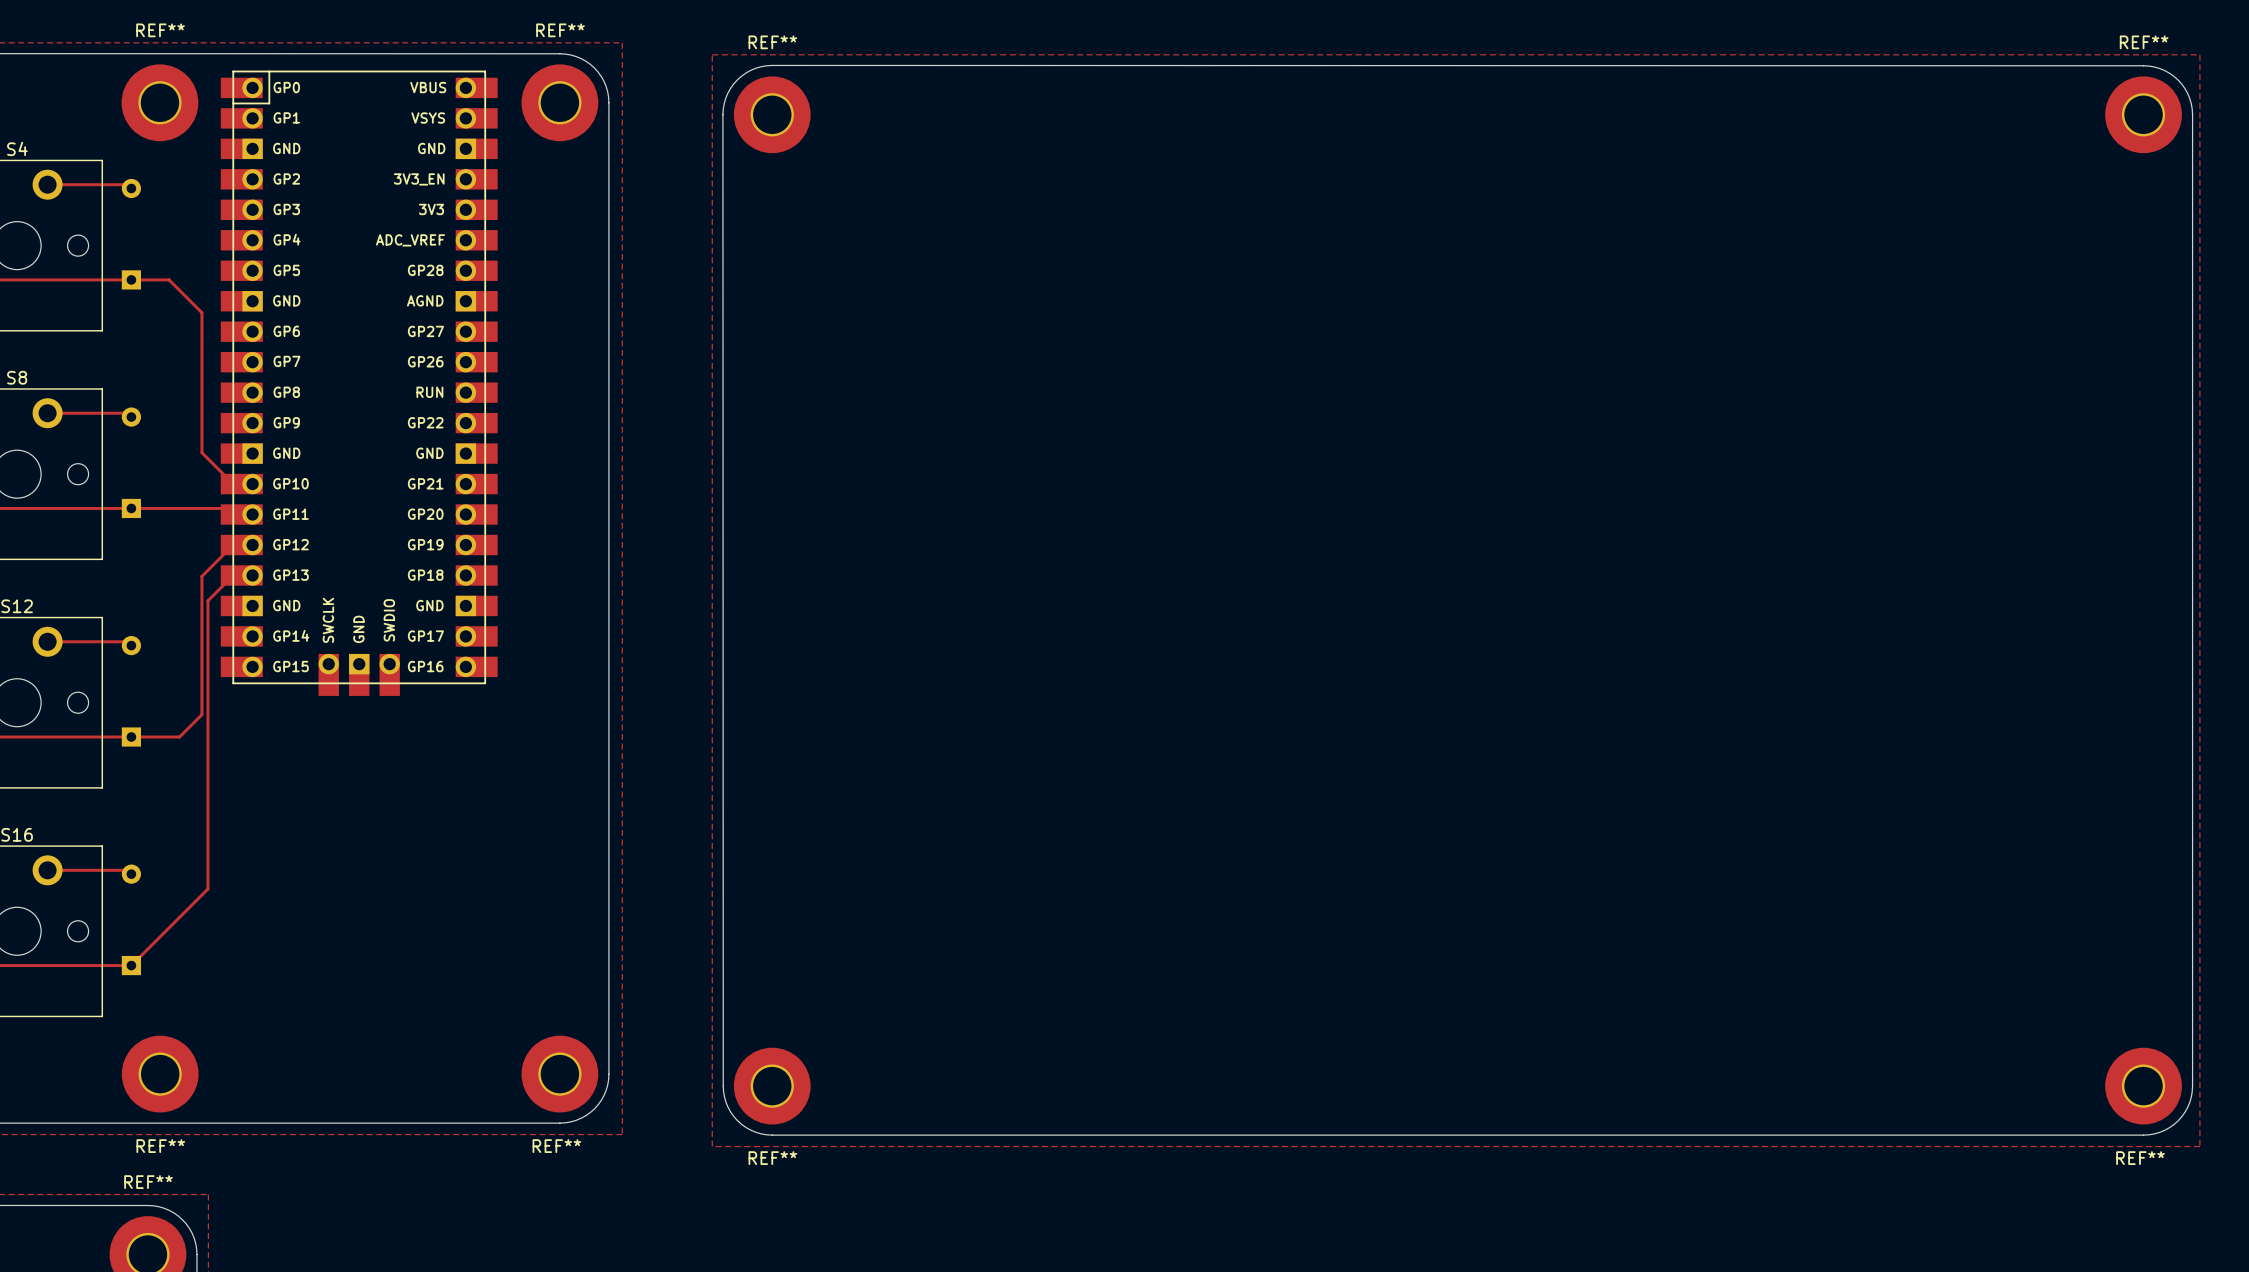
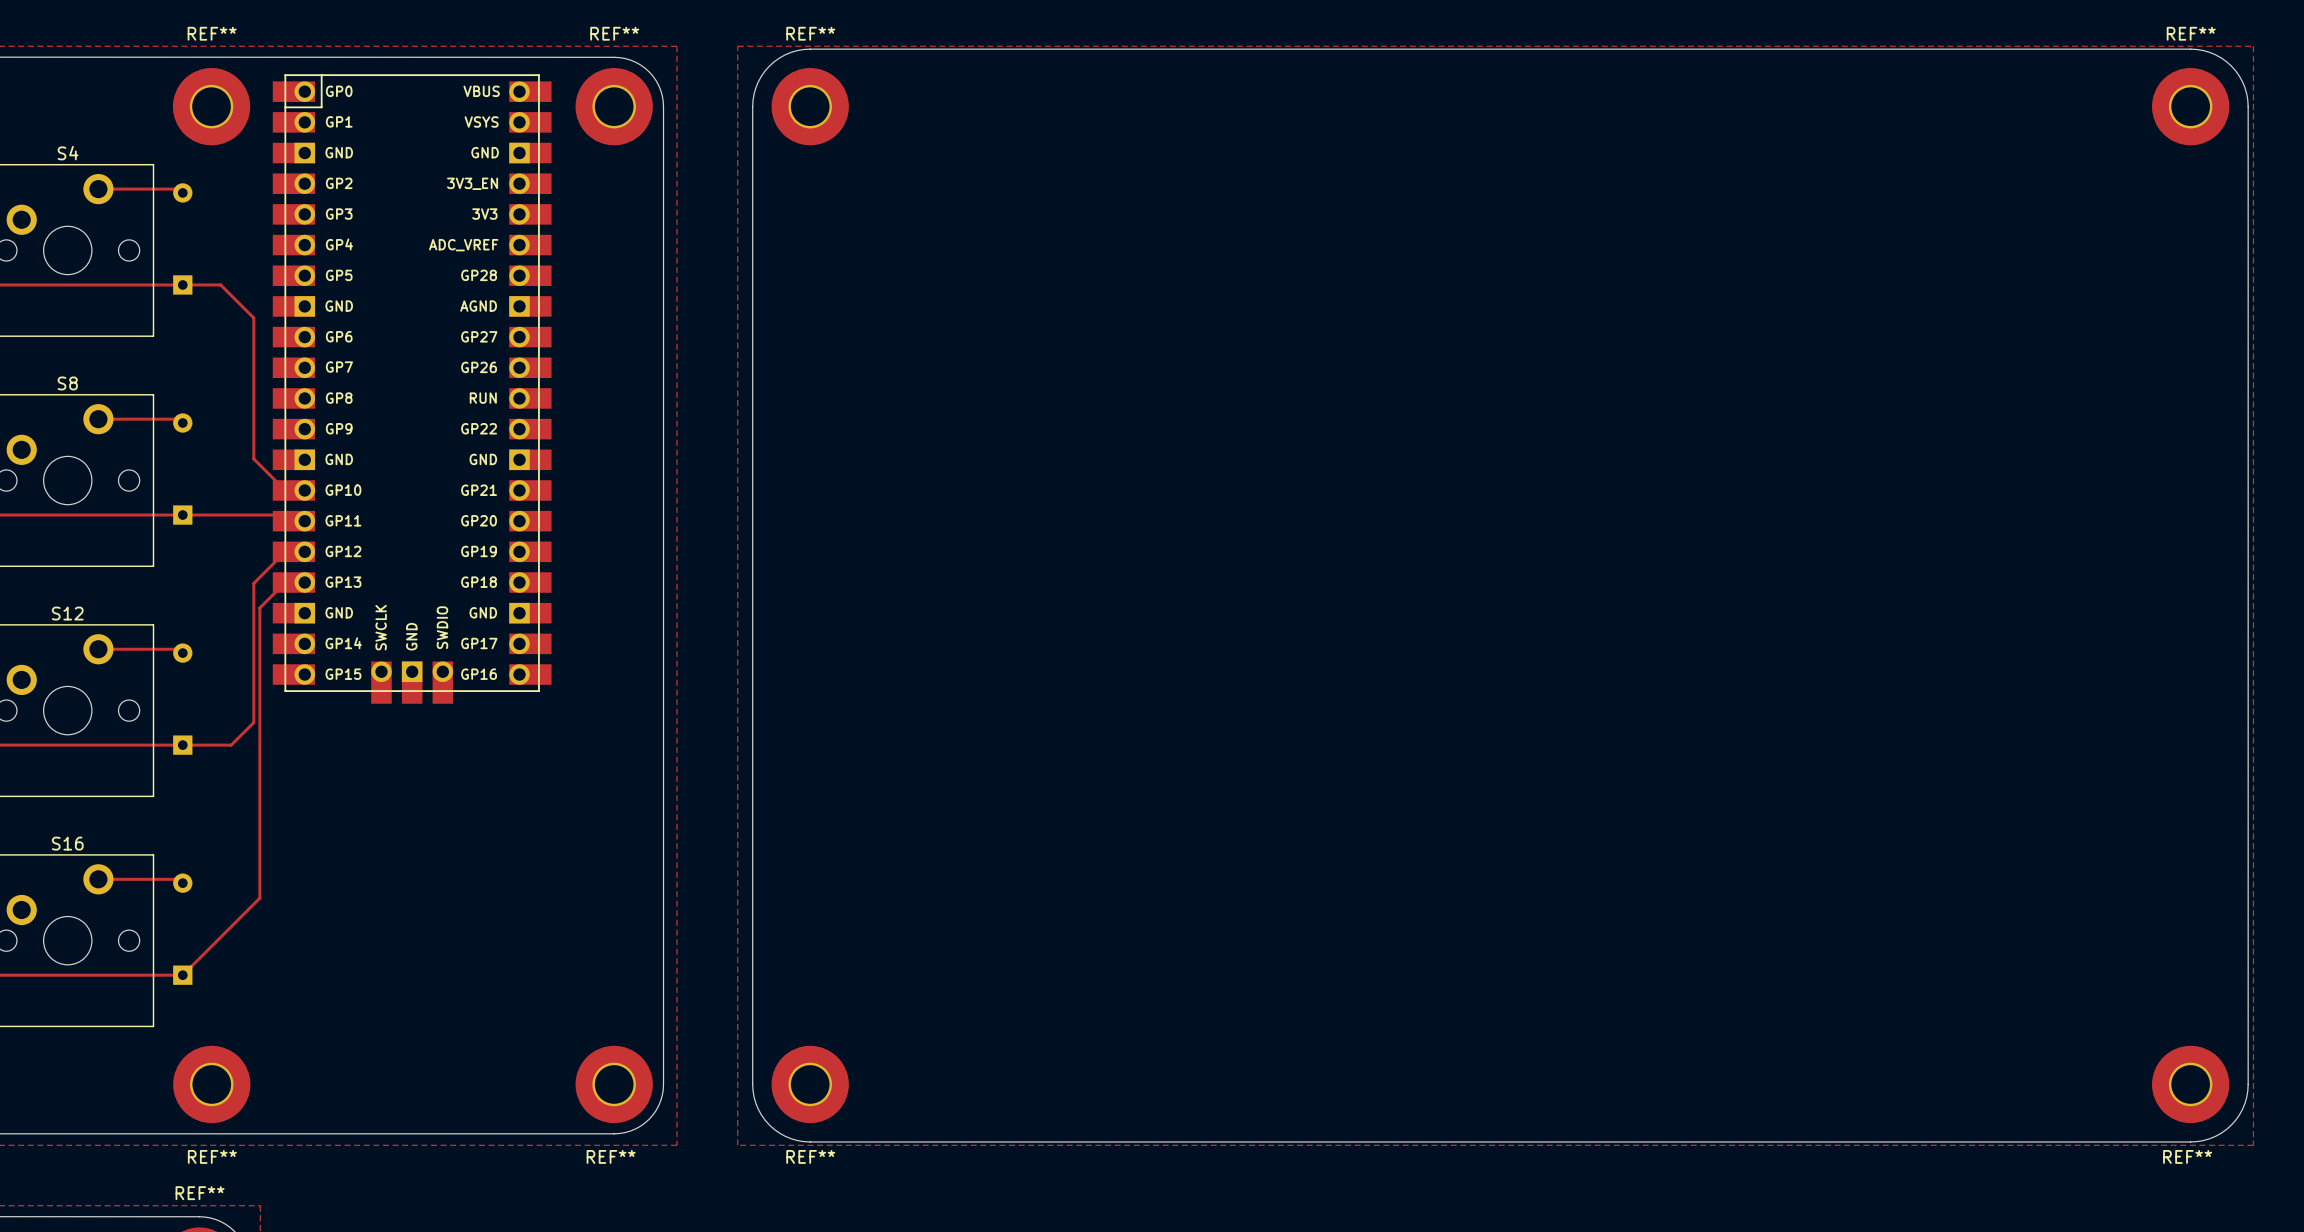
zone outline: (712, 54) (2199, 54) (2199, 1146) (712, 1146) (712, 54) -> (737, 46) (737, 1145) (2253, 1145) (2253, 46) (737, 46)
board edge: (772, 65) (2143, 65) (2159, 68) (2174, 76) (2187, 93) (2192, 114) (2192, 1086) (2189, 1102) (2181, 1116) (2164, 1130) (2143, 1135) (772, 1135) (756, 1132) (741, 1124) (728, 1107) (723, 1086) (722, 114) (727, 93) (737, 79) (750, 70) (772, 65) -> (810, 49) (785, 54) (769, 65) (755, 87) (752, 106) (752, 1084) (758, 1109) (774, 1129) (791, 1138) (810, 1141) (2190, 1141) (2215, 1136) (2235, 1120) (2244, 1103) (2248, 1084) (2248, 106) (2242, 81) (2226, 61) (2209, 52) (2190, 49) (810, 49)
REF** position: (772, 114) -> (810, 106)
REF** position: (2143, 114) -> (2190, 106)
REF** position: (772, 1086) -> (810, 1084)
REF** position: (2143, 1086) -> (2190, 1084)

